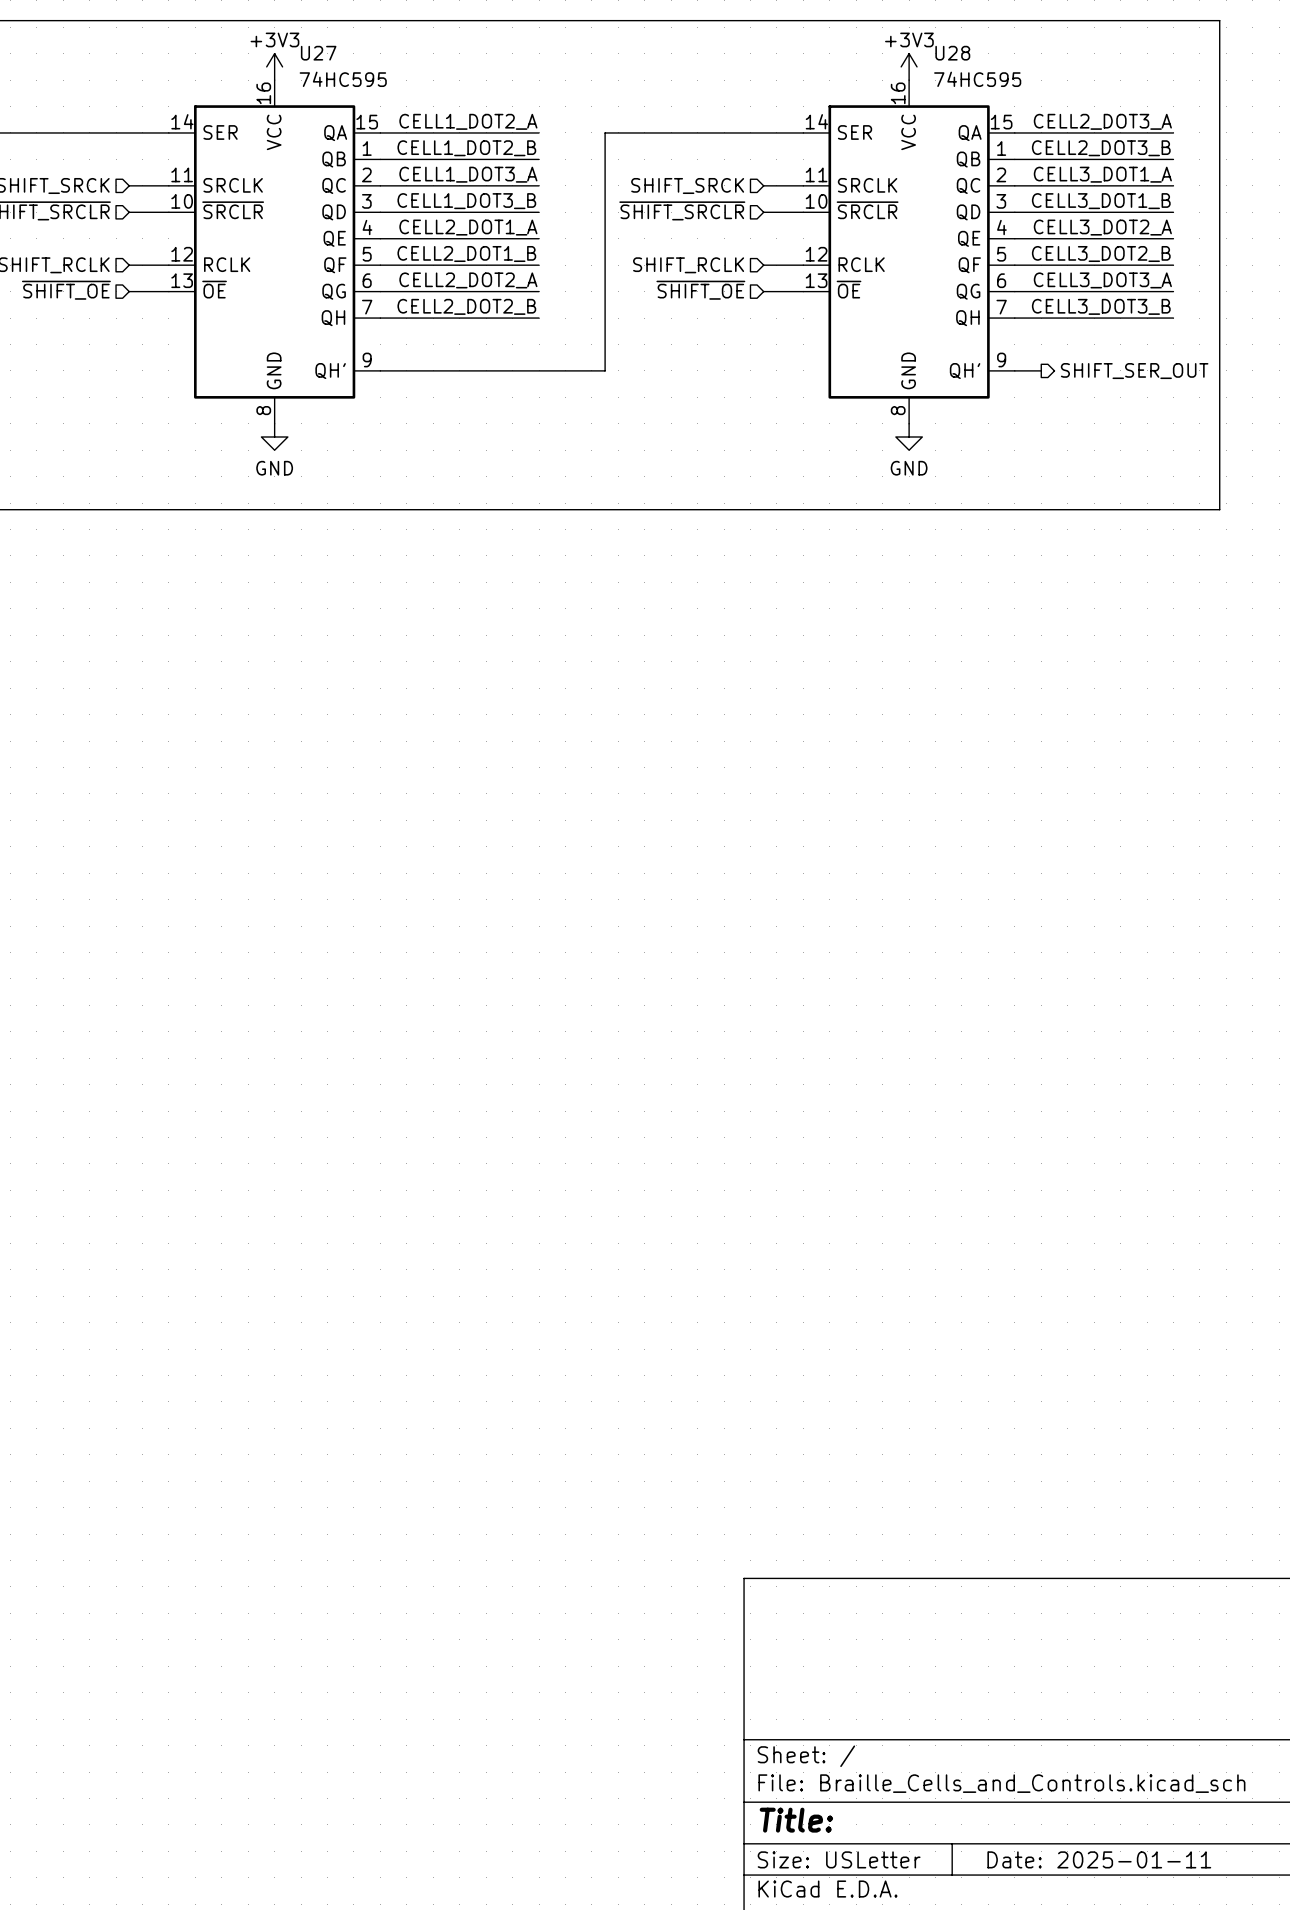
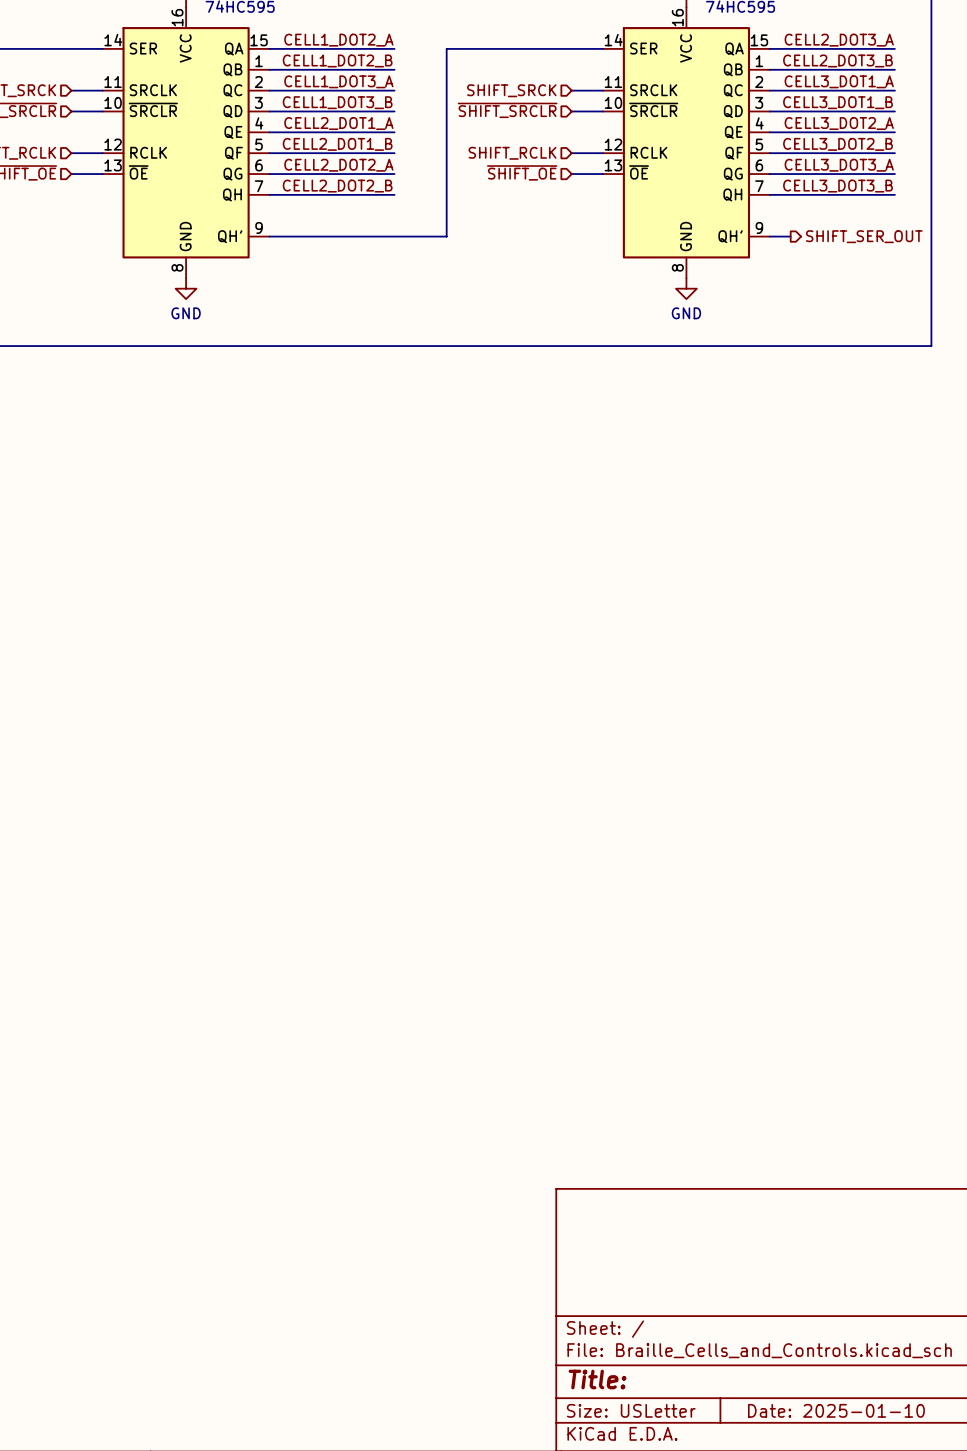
title block: Date: 2025-01-11 (1099, 1859) -> Date: 2025-01-10 (836, 1410)

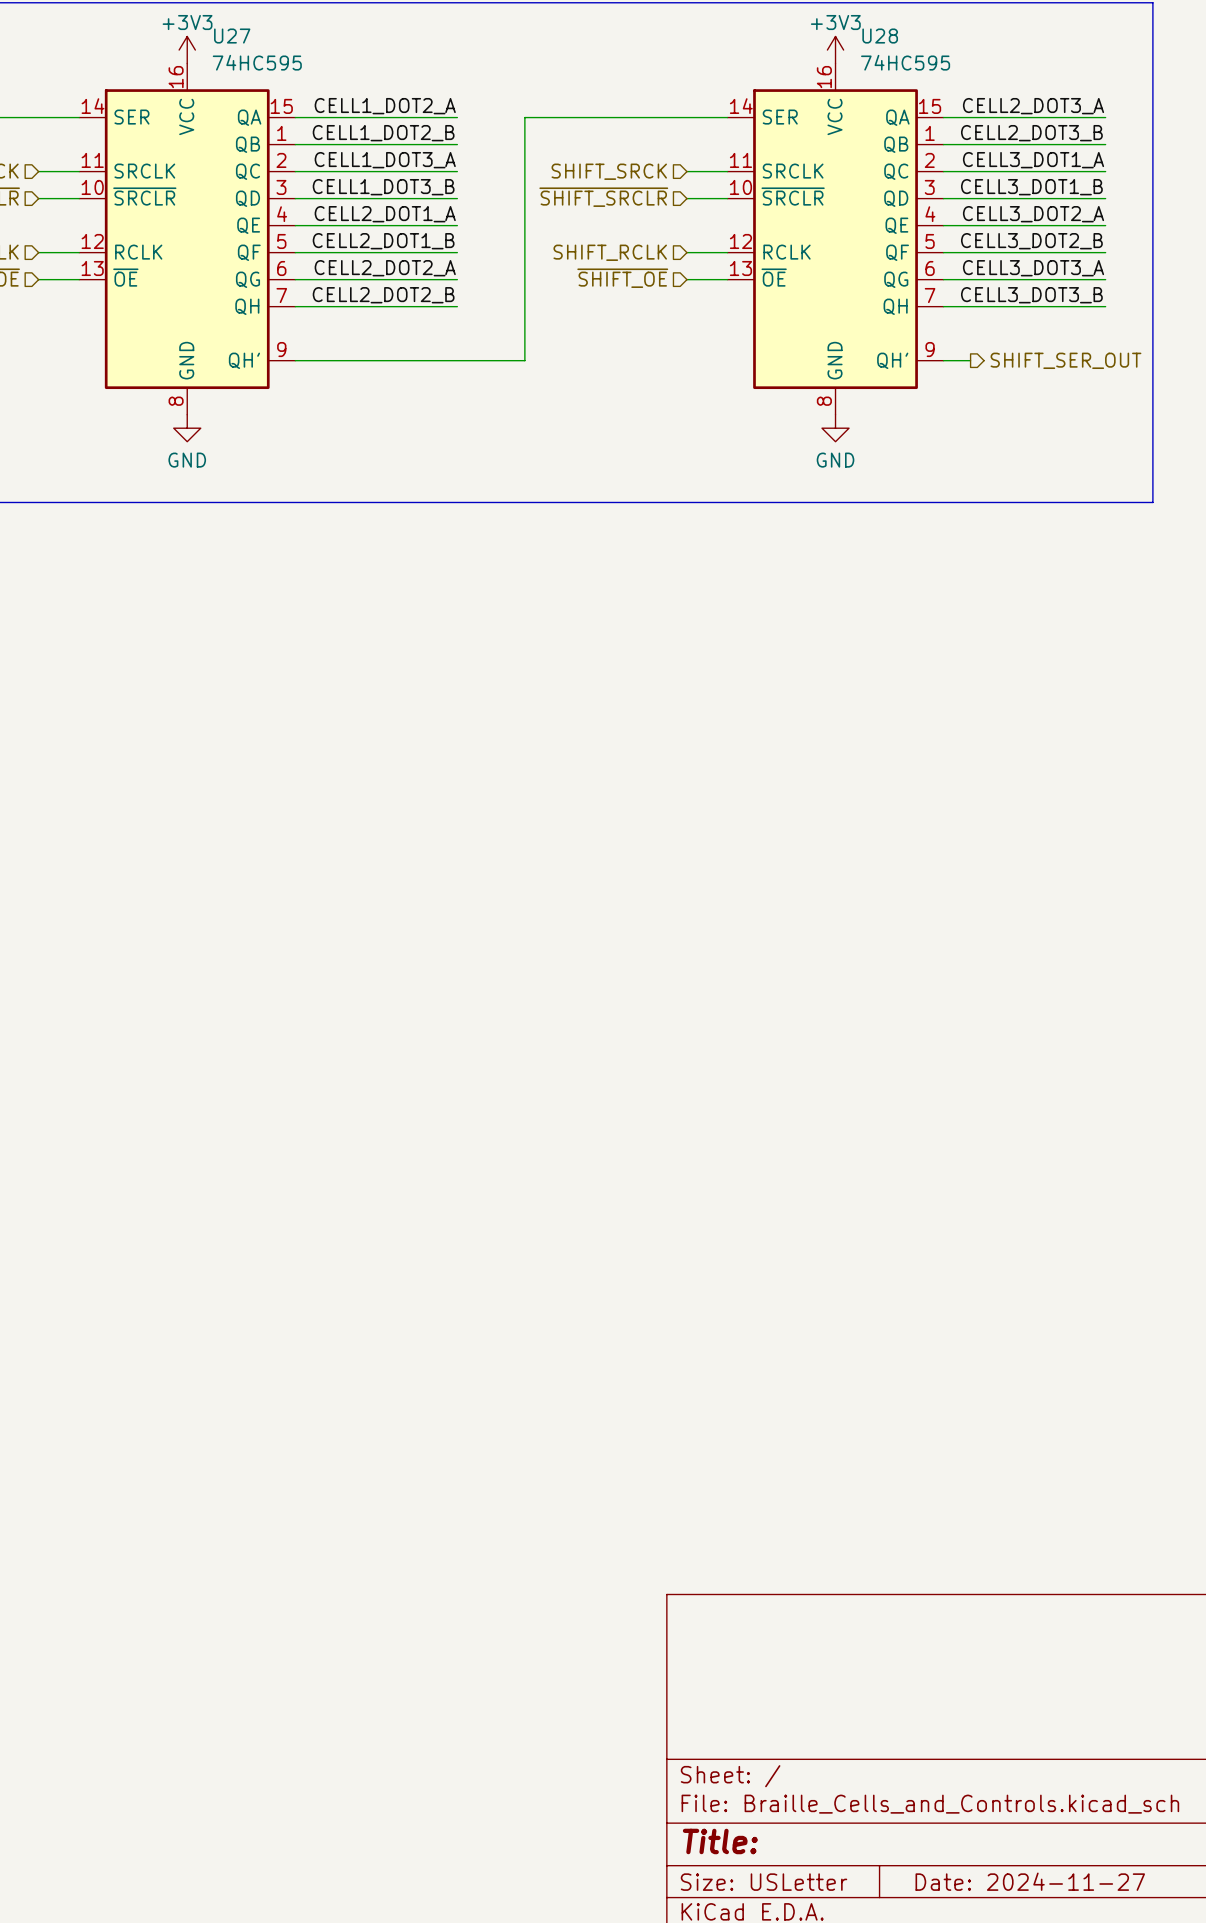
title block: Date: 2025-01-10 (836, 1410) -> Date: 2024-11-27 (1030, 1881)

